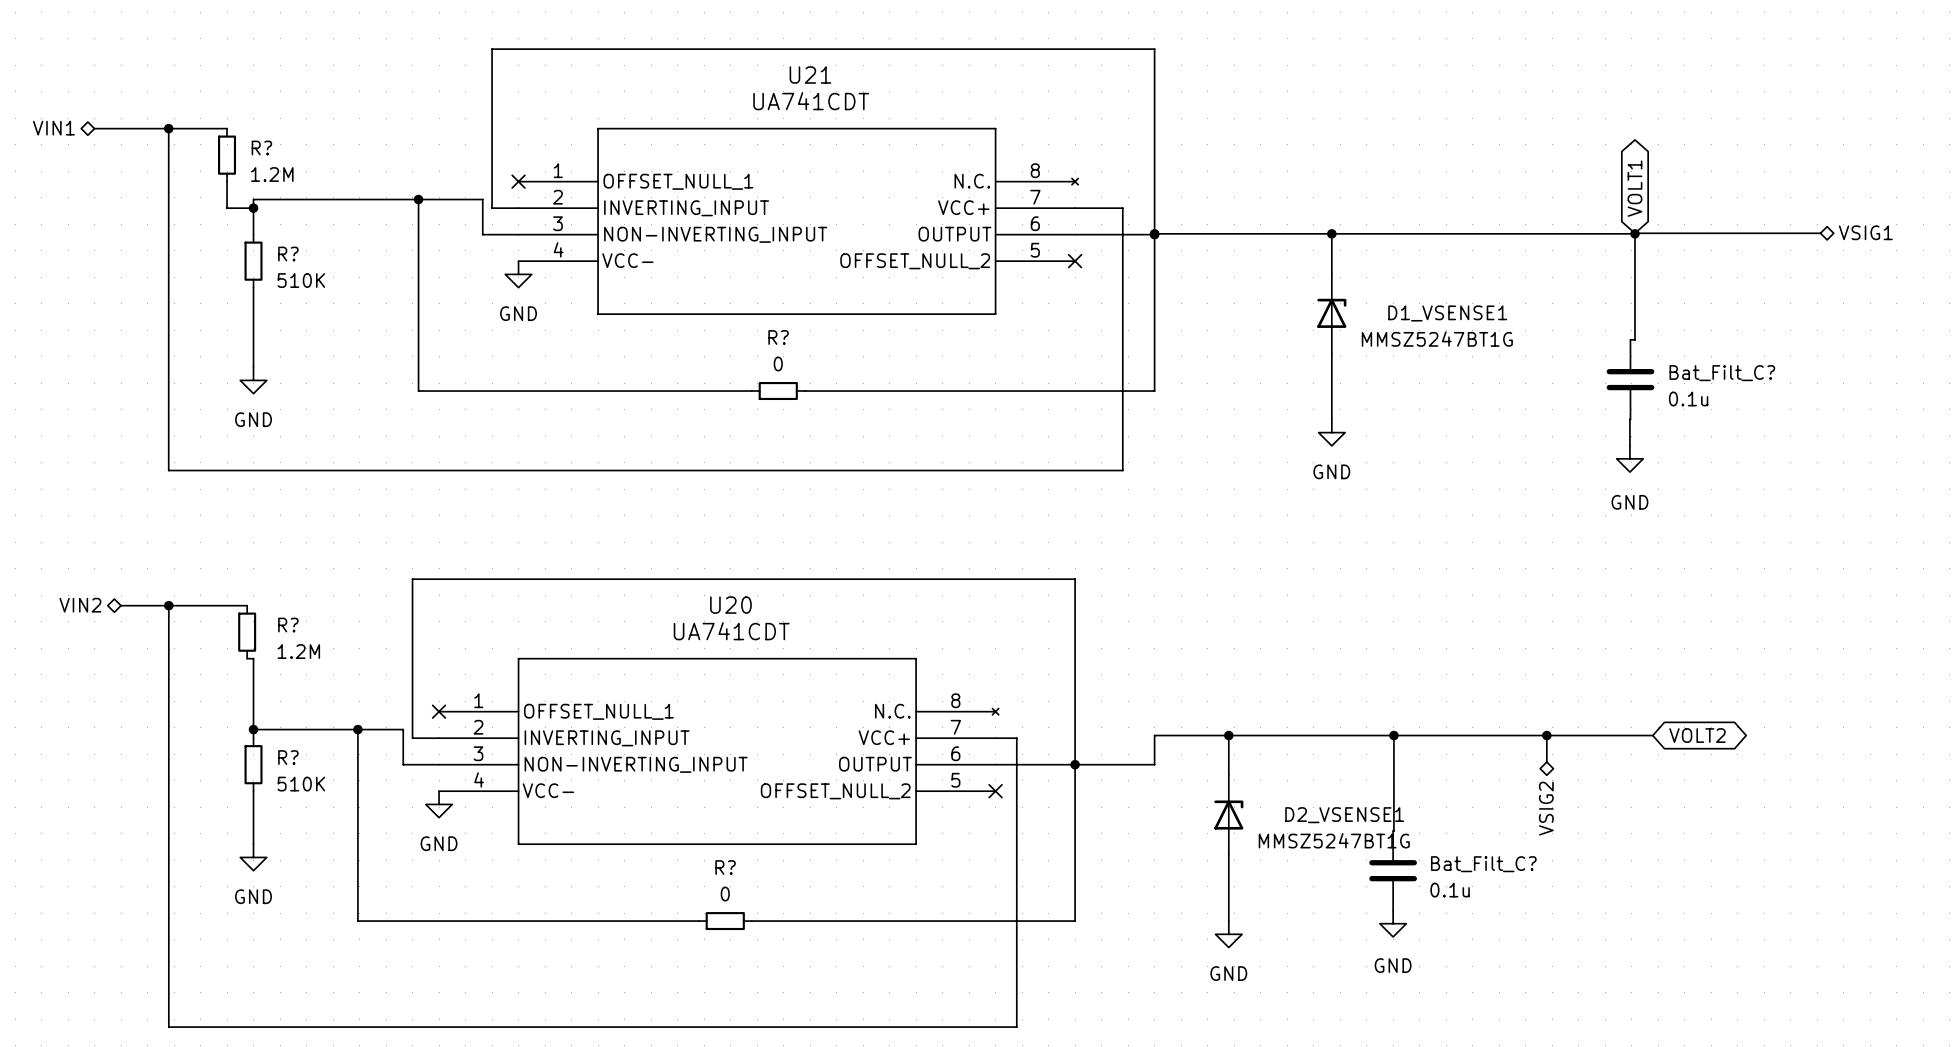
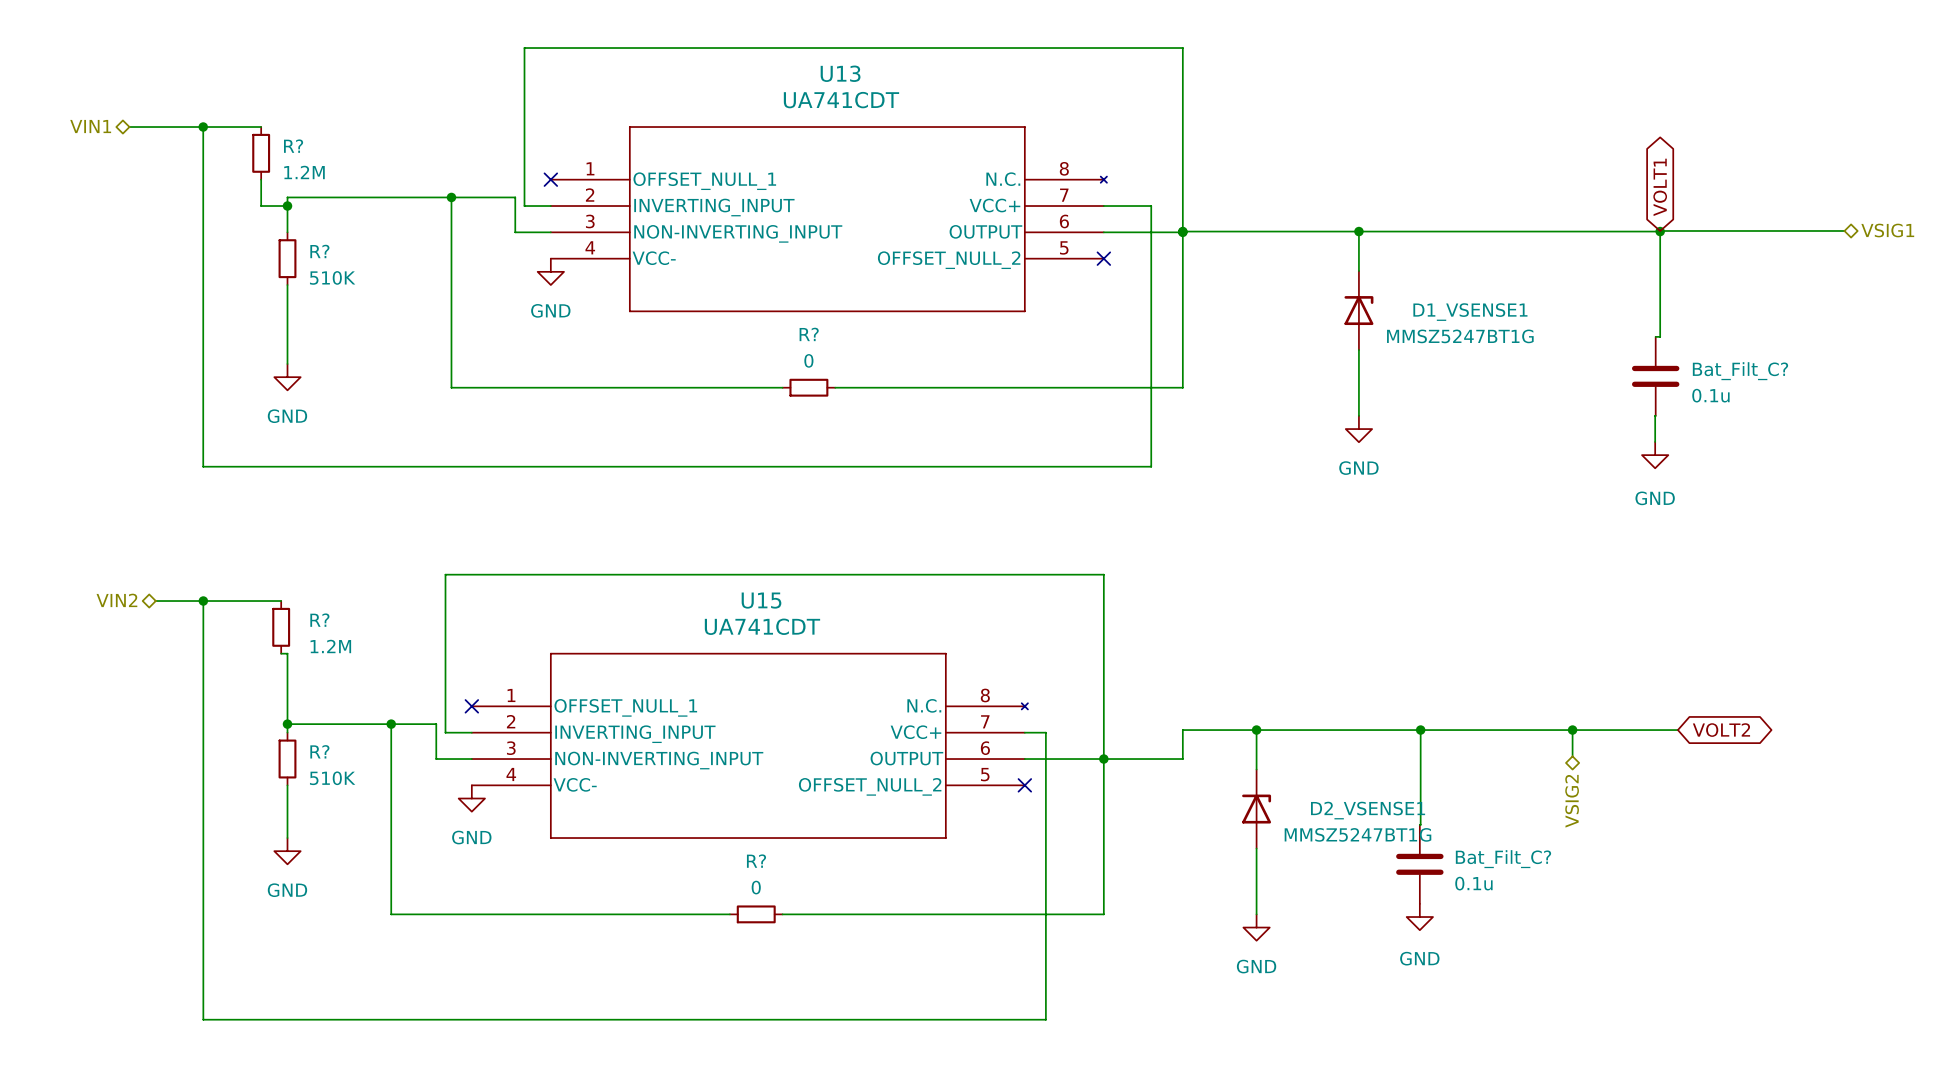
U21 name: U21 (810, 75) -> U13 (840, 73)
U20 name: U20 (730, 605) -> U15 (761, 600)

